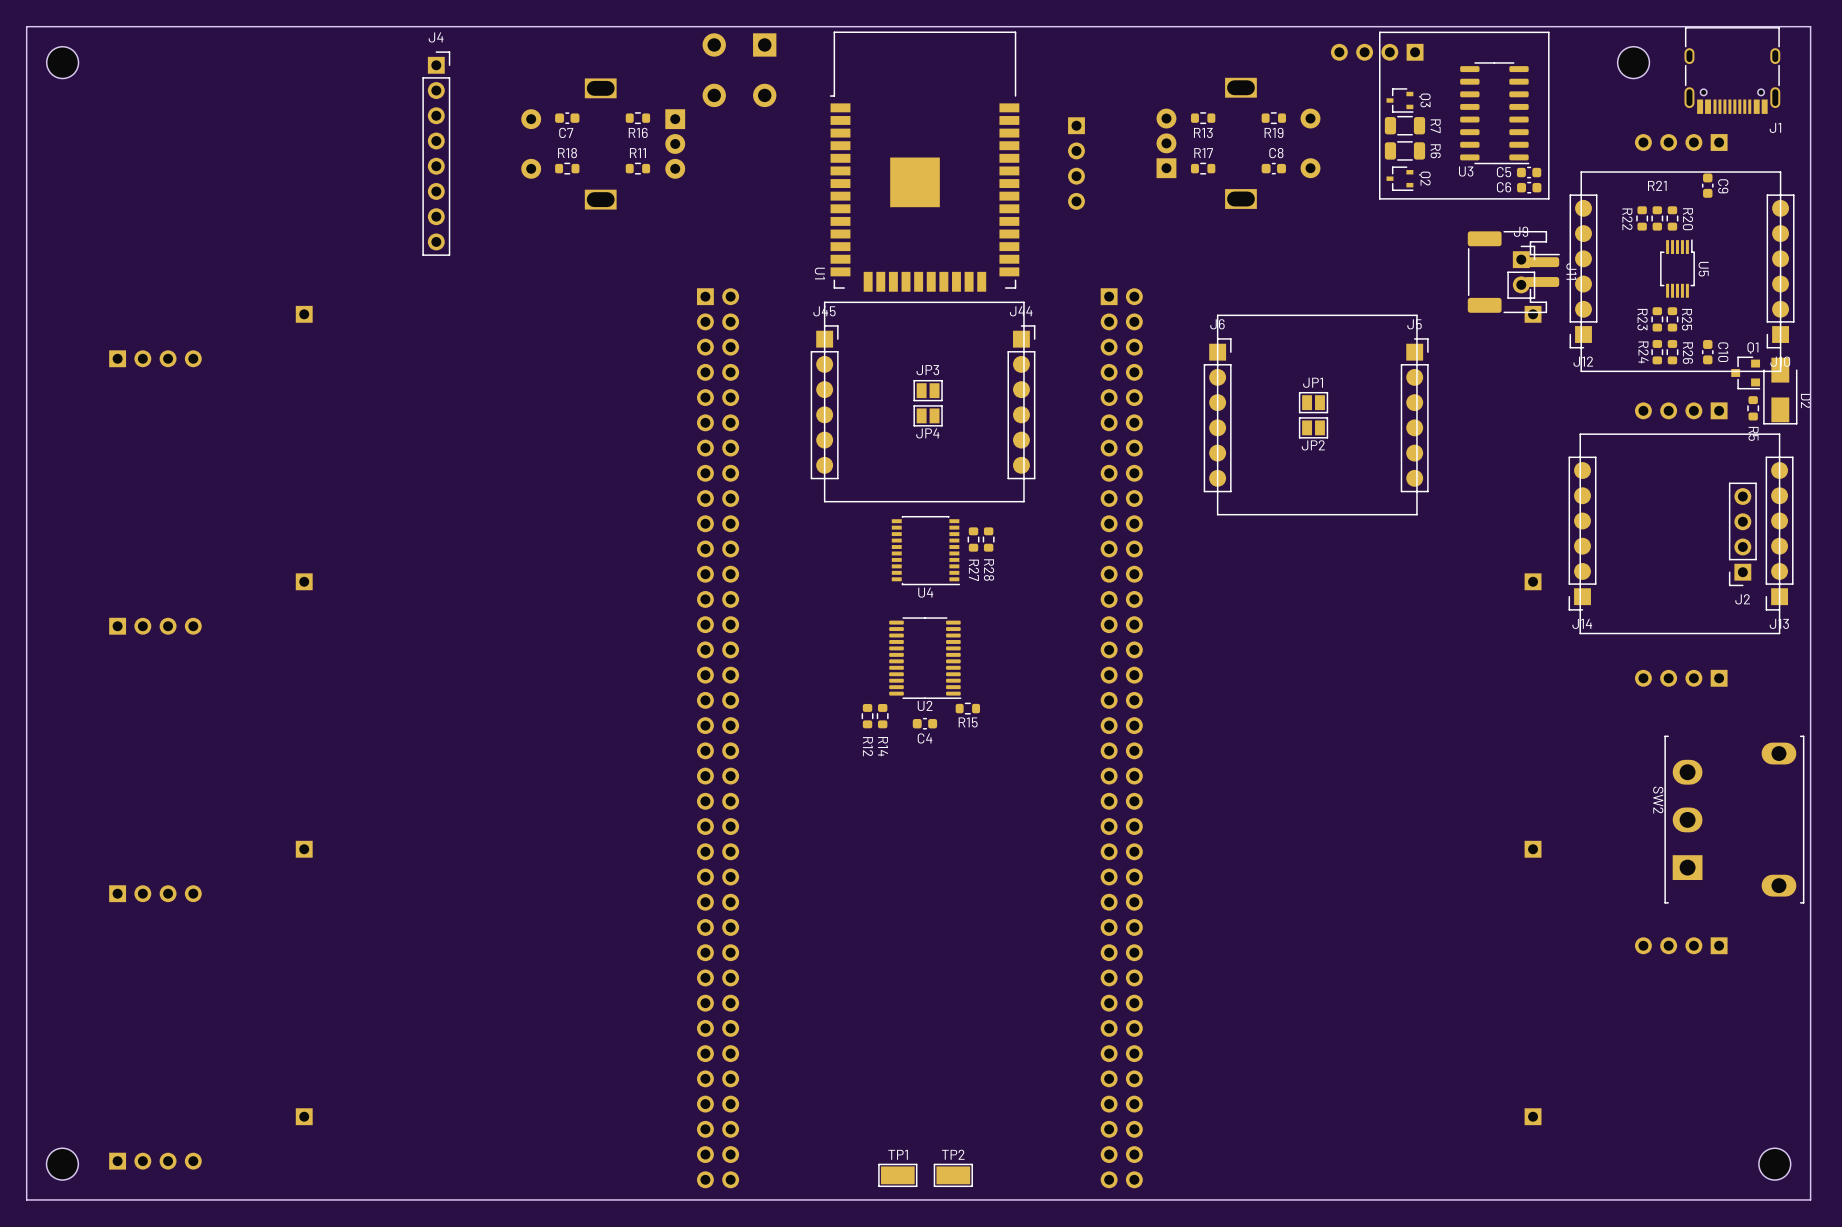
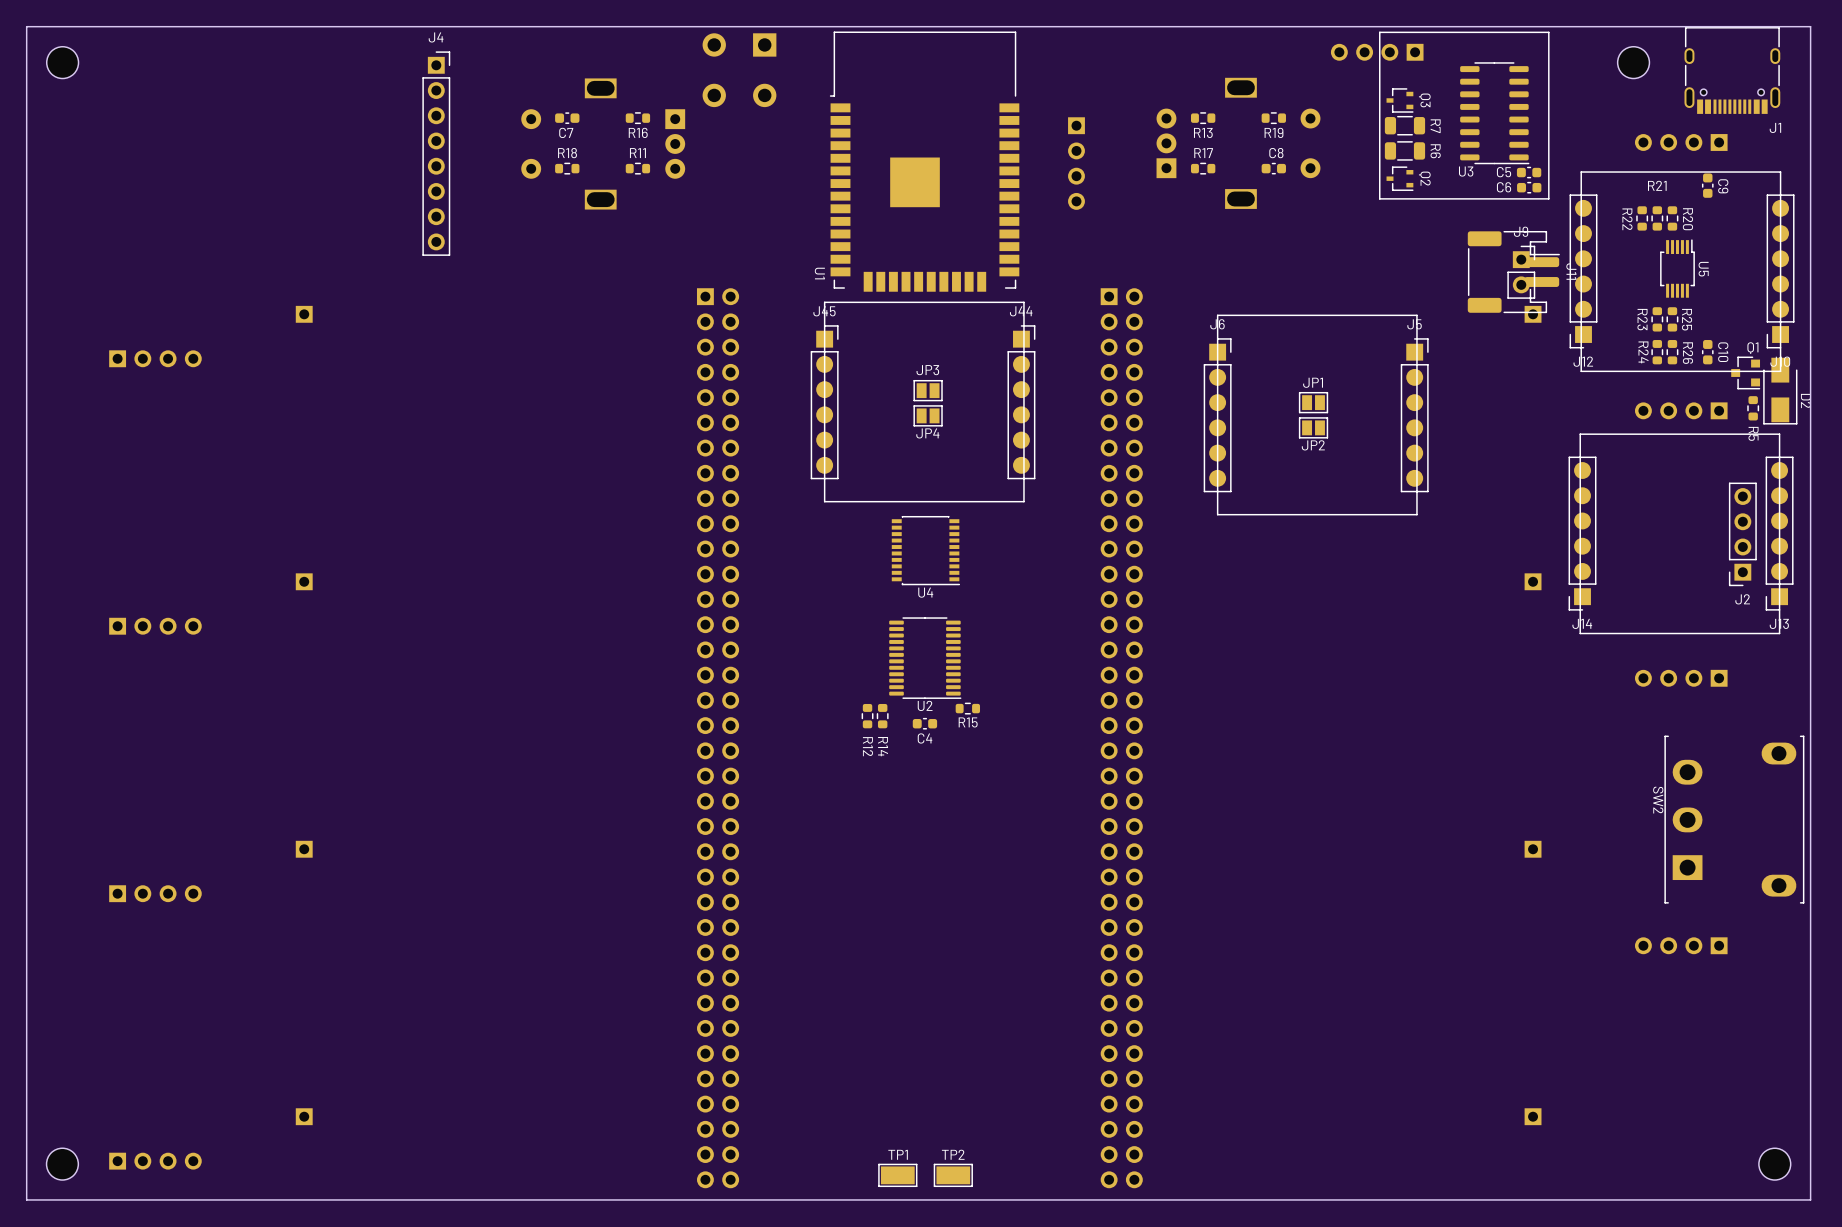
R27: (973, 539) -> none
R28: (988, 539) -> none

